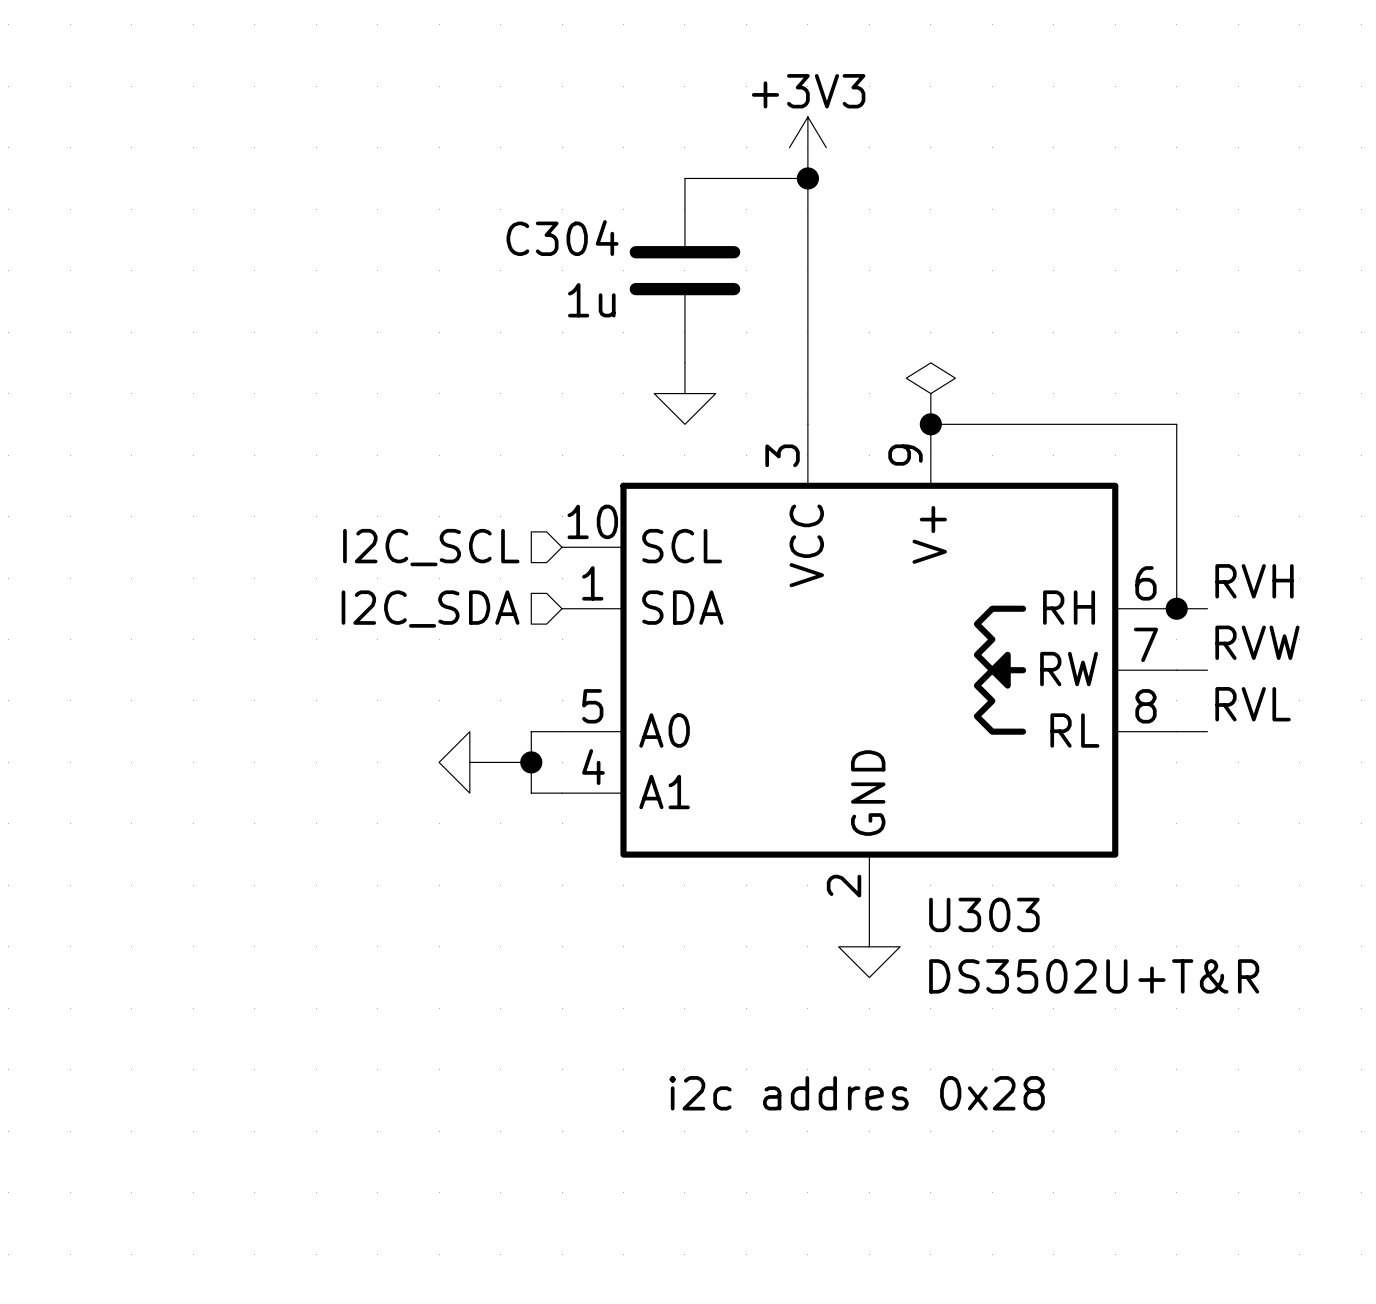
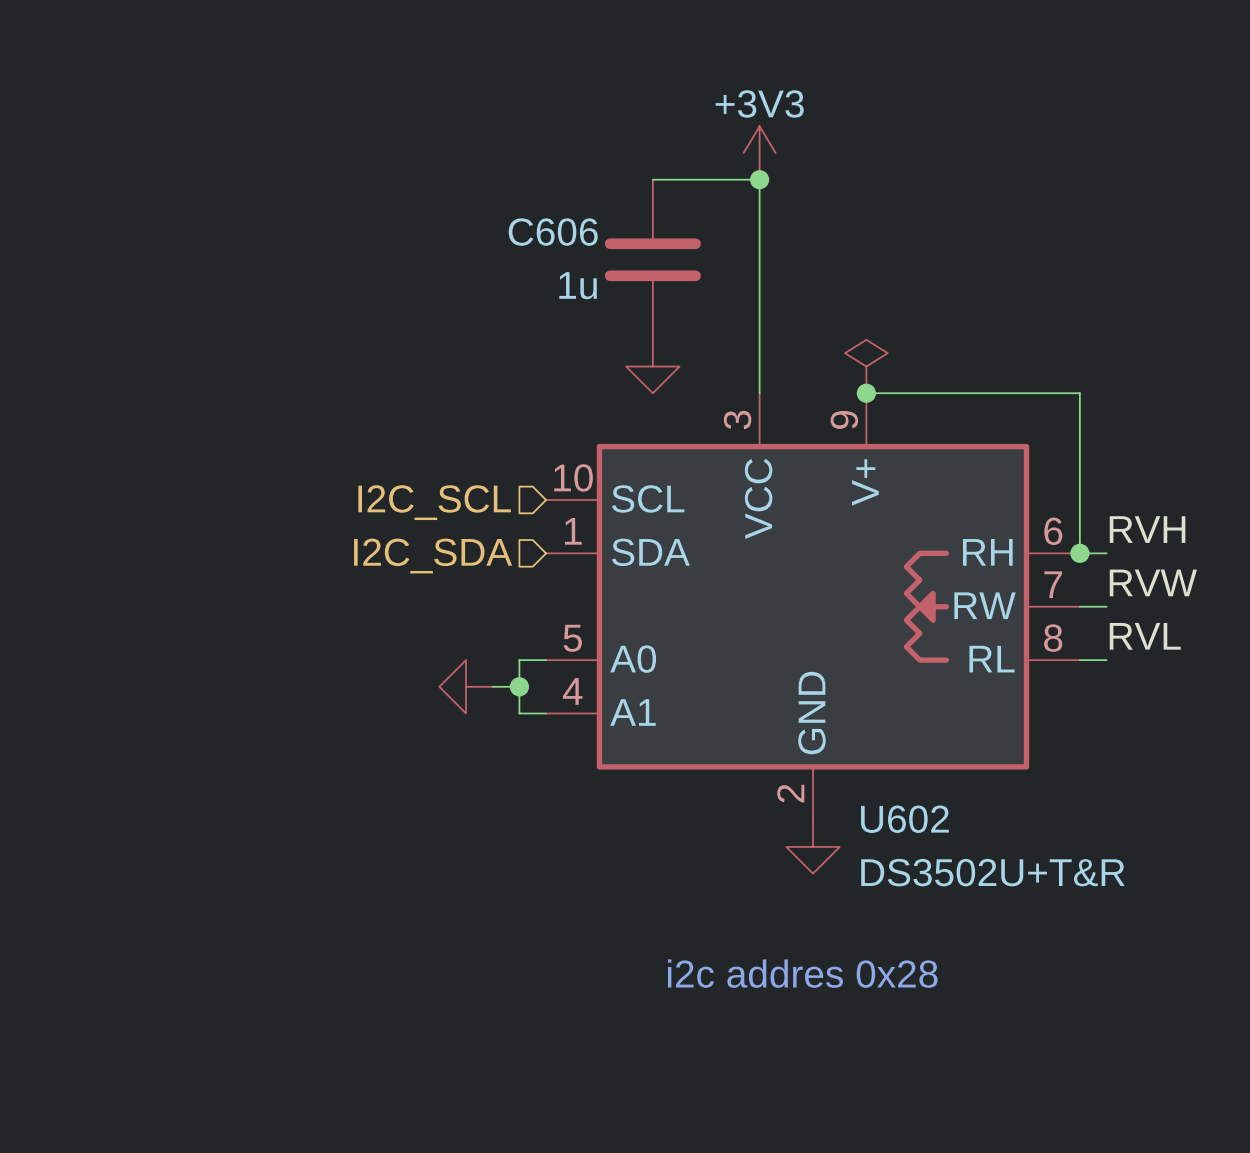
C304 name: C304 (562, 238) -> C606 (553, 232)
U303 name: U303 (984, 914) -> U602 (904, 819)

